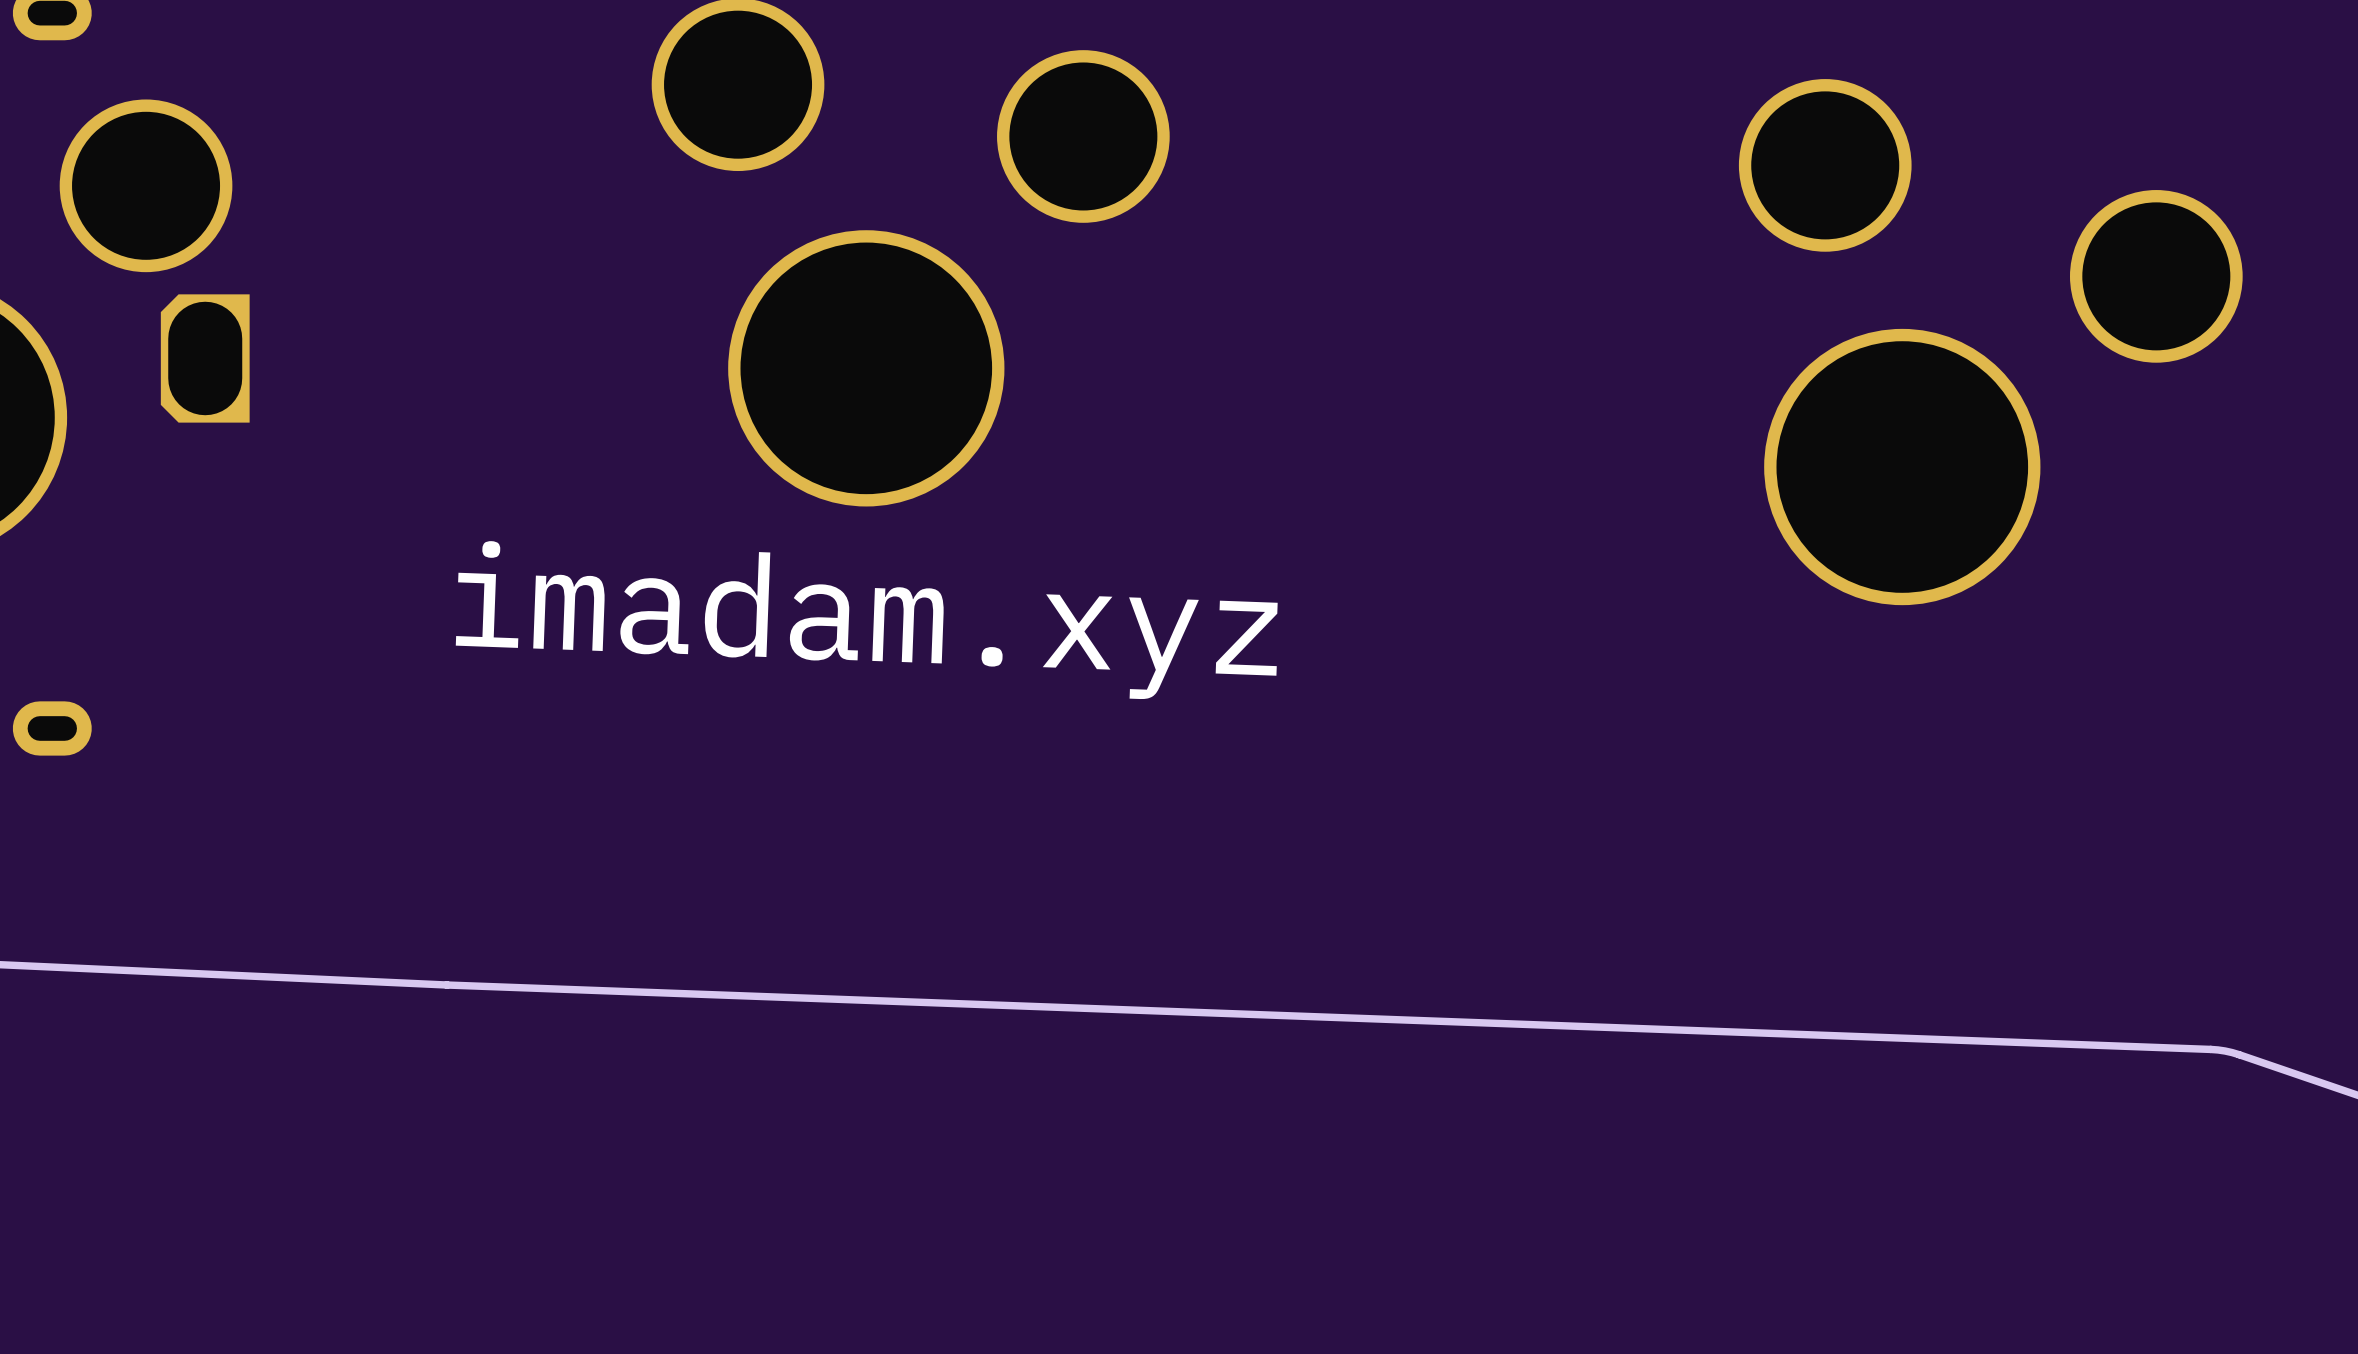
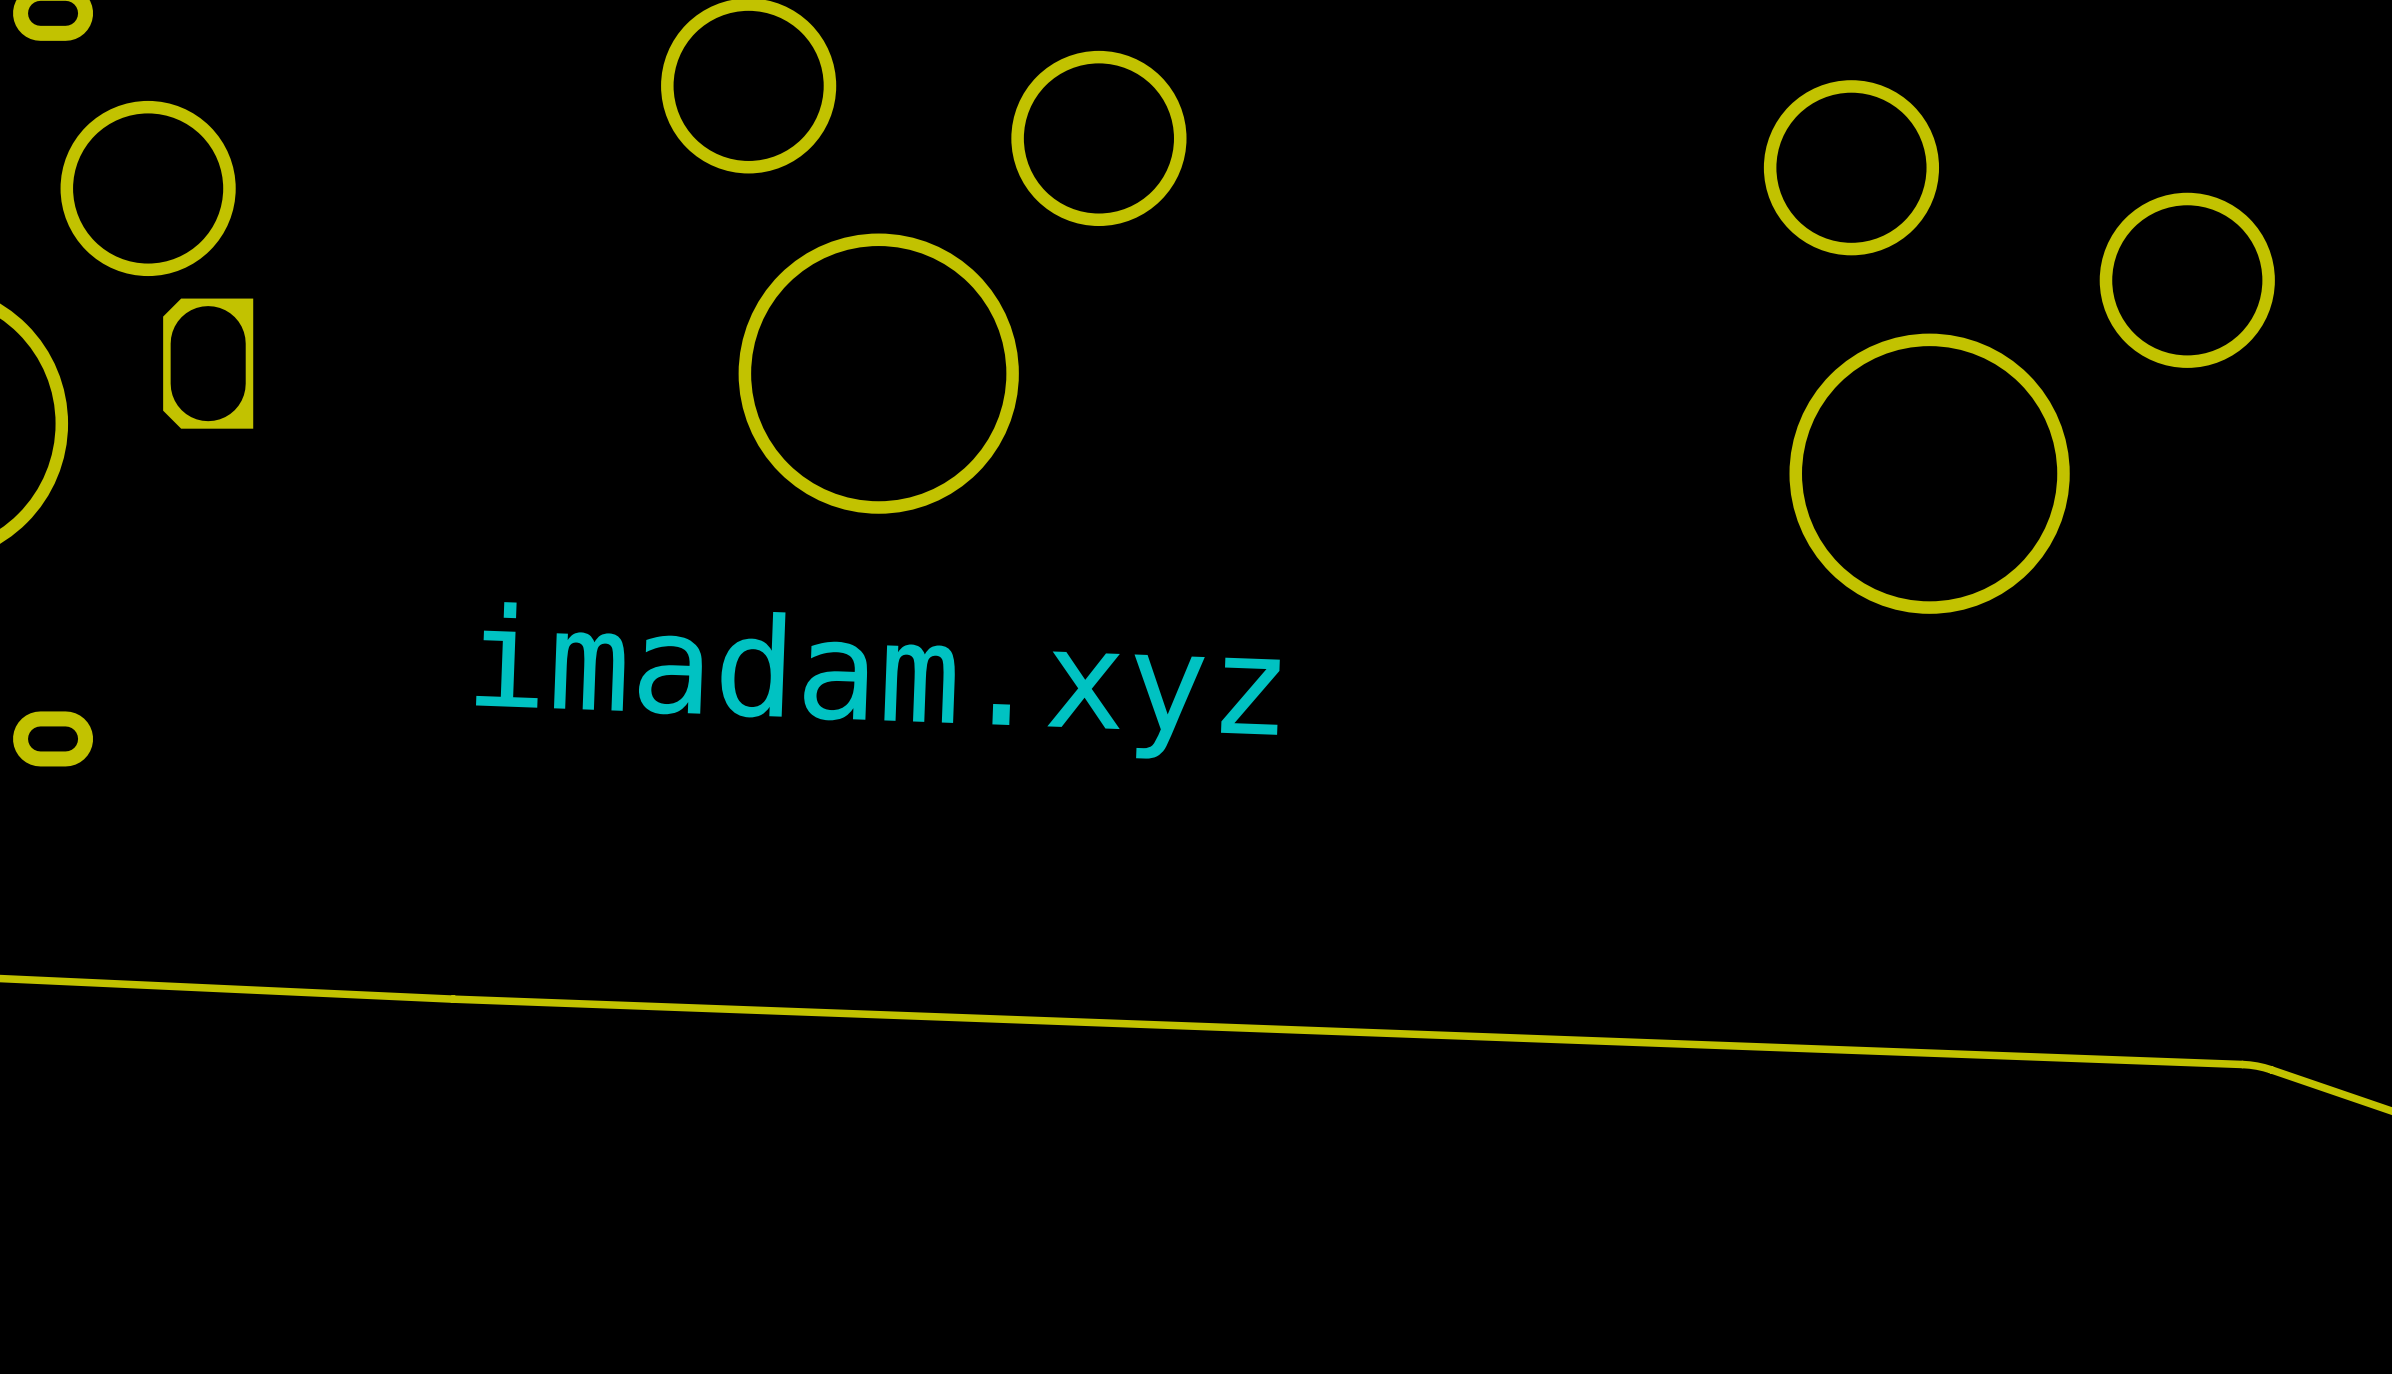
text position: imadam.xyz (866, 620) -> imadam.xyz (877, 680)

